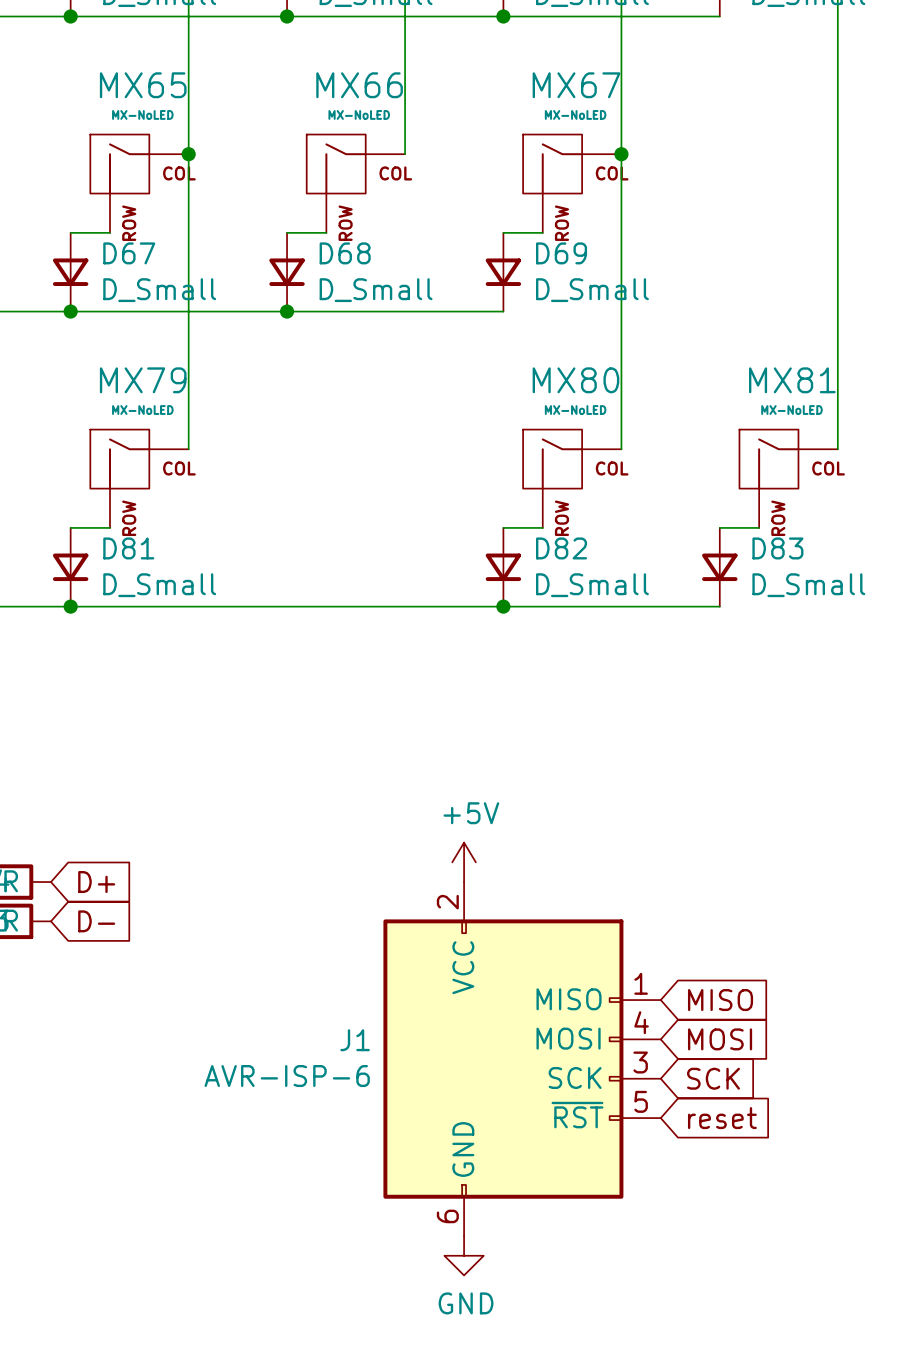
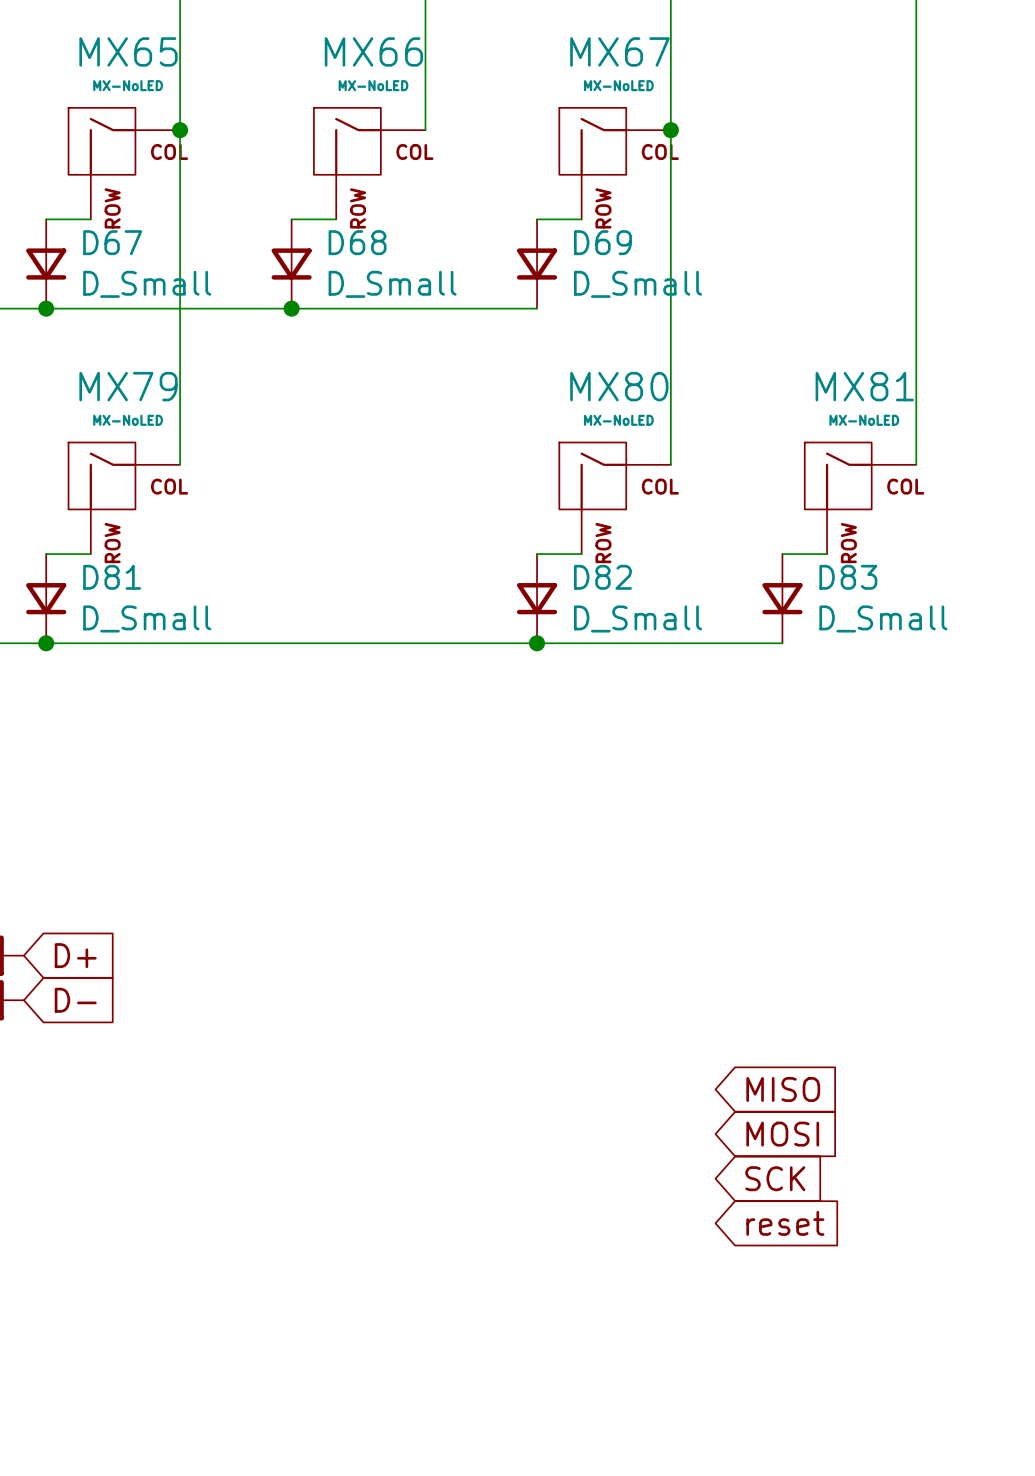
power symbol: +5V (464, 862) -> none
J1: AVR-ISP-6 (522, 1059) -> none
power symbol: GND (464, 1255) -> none

